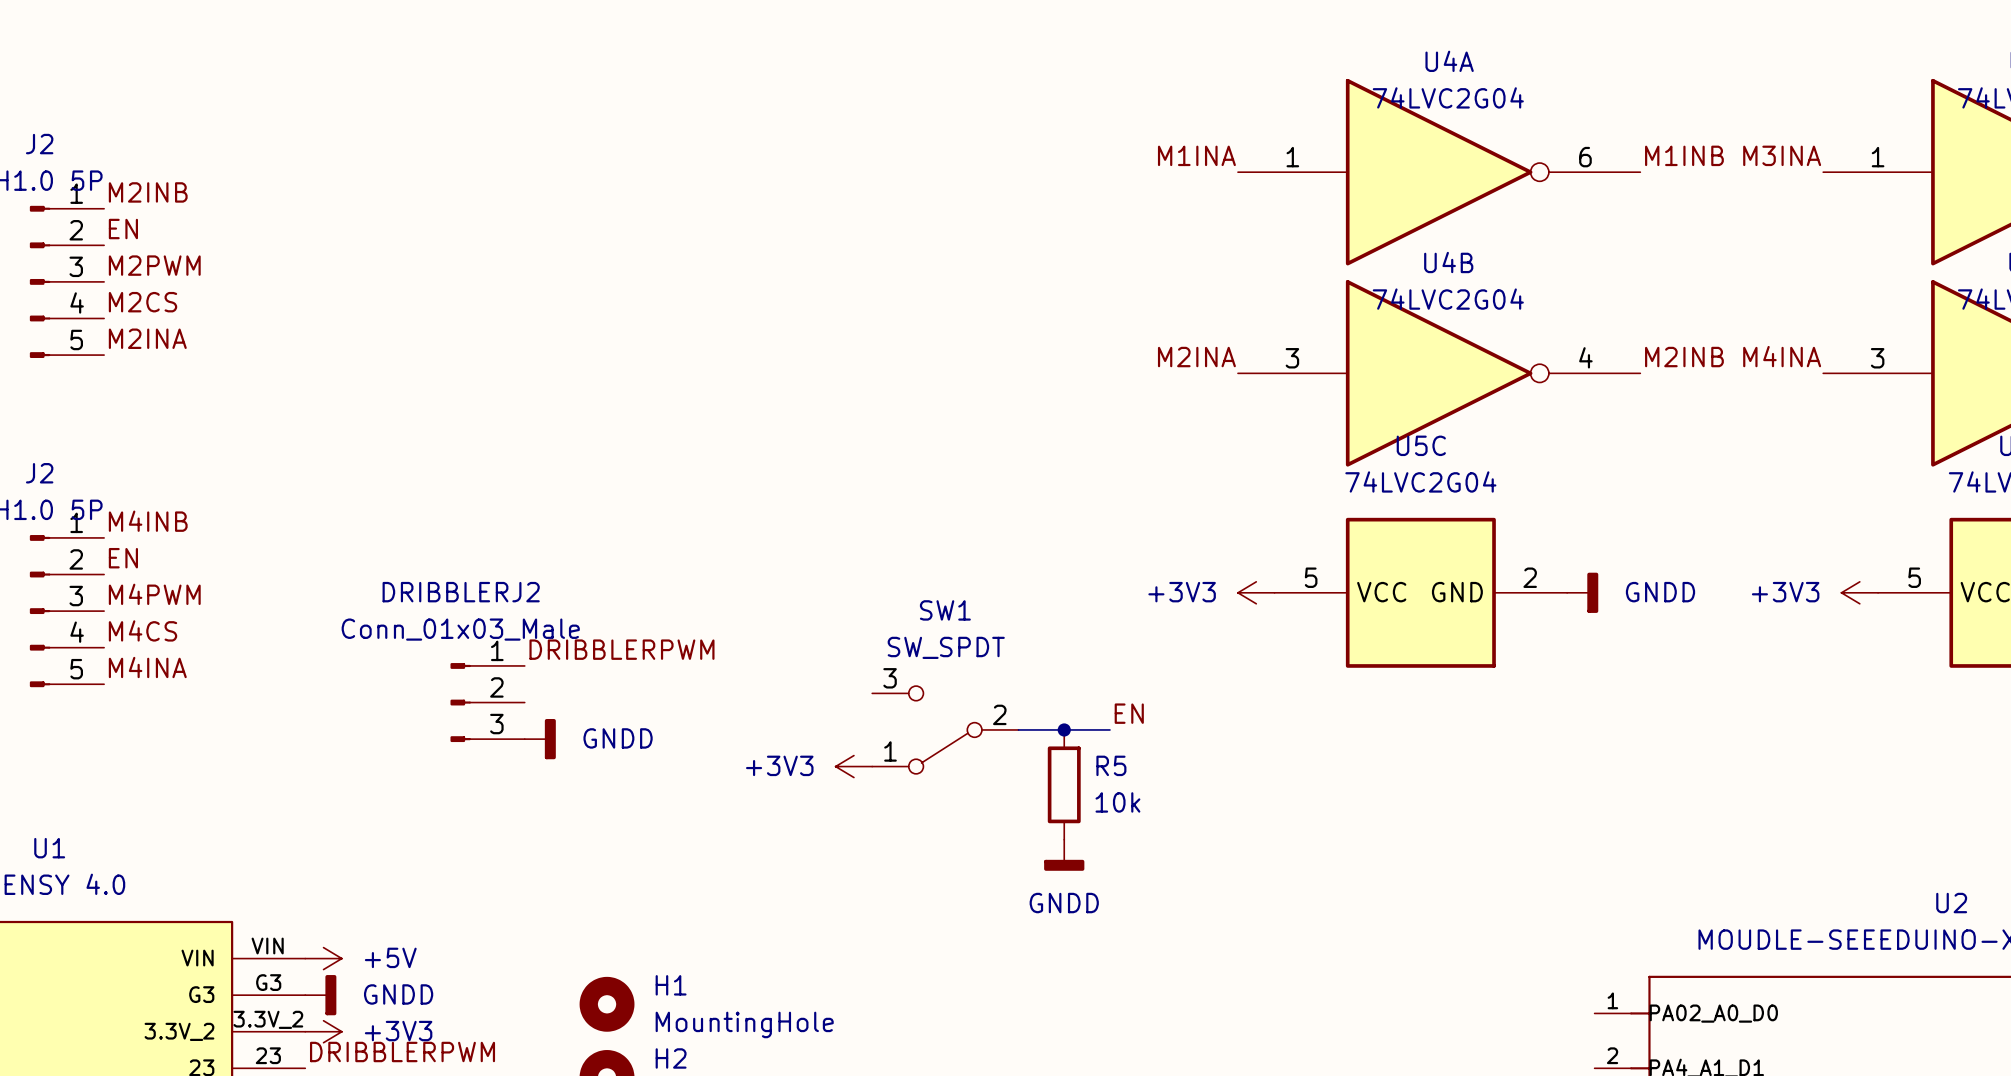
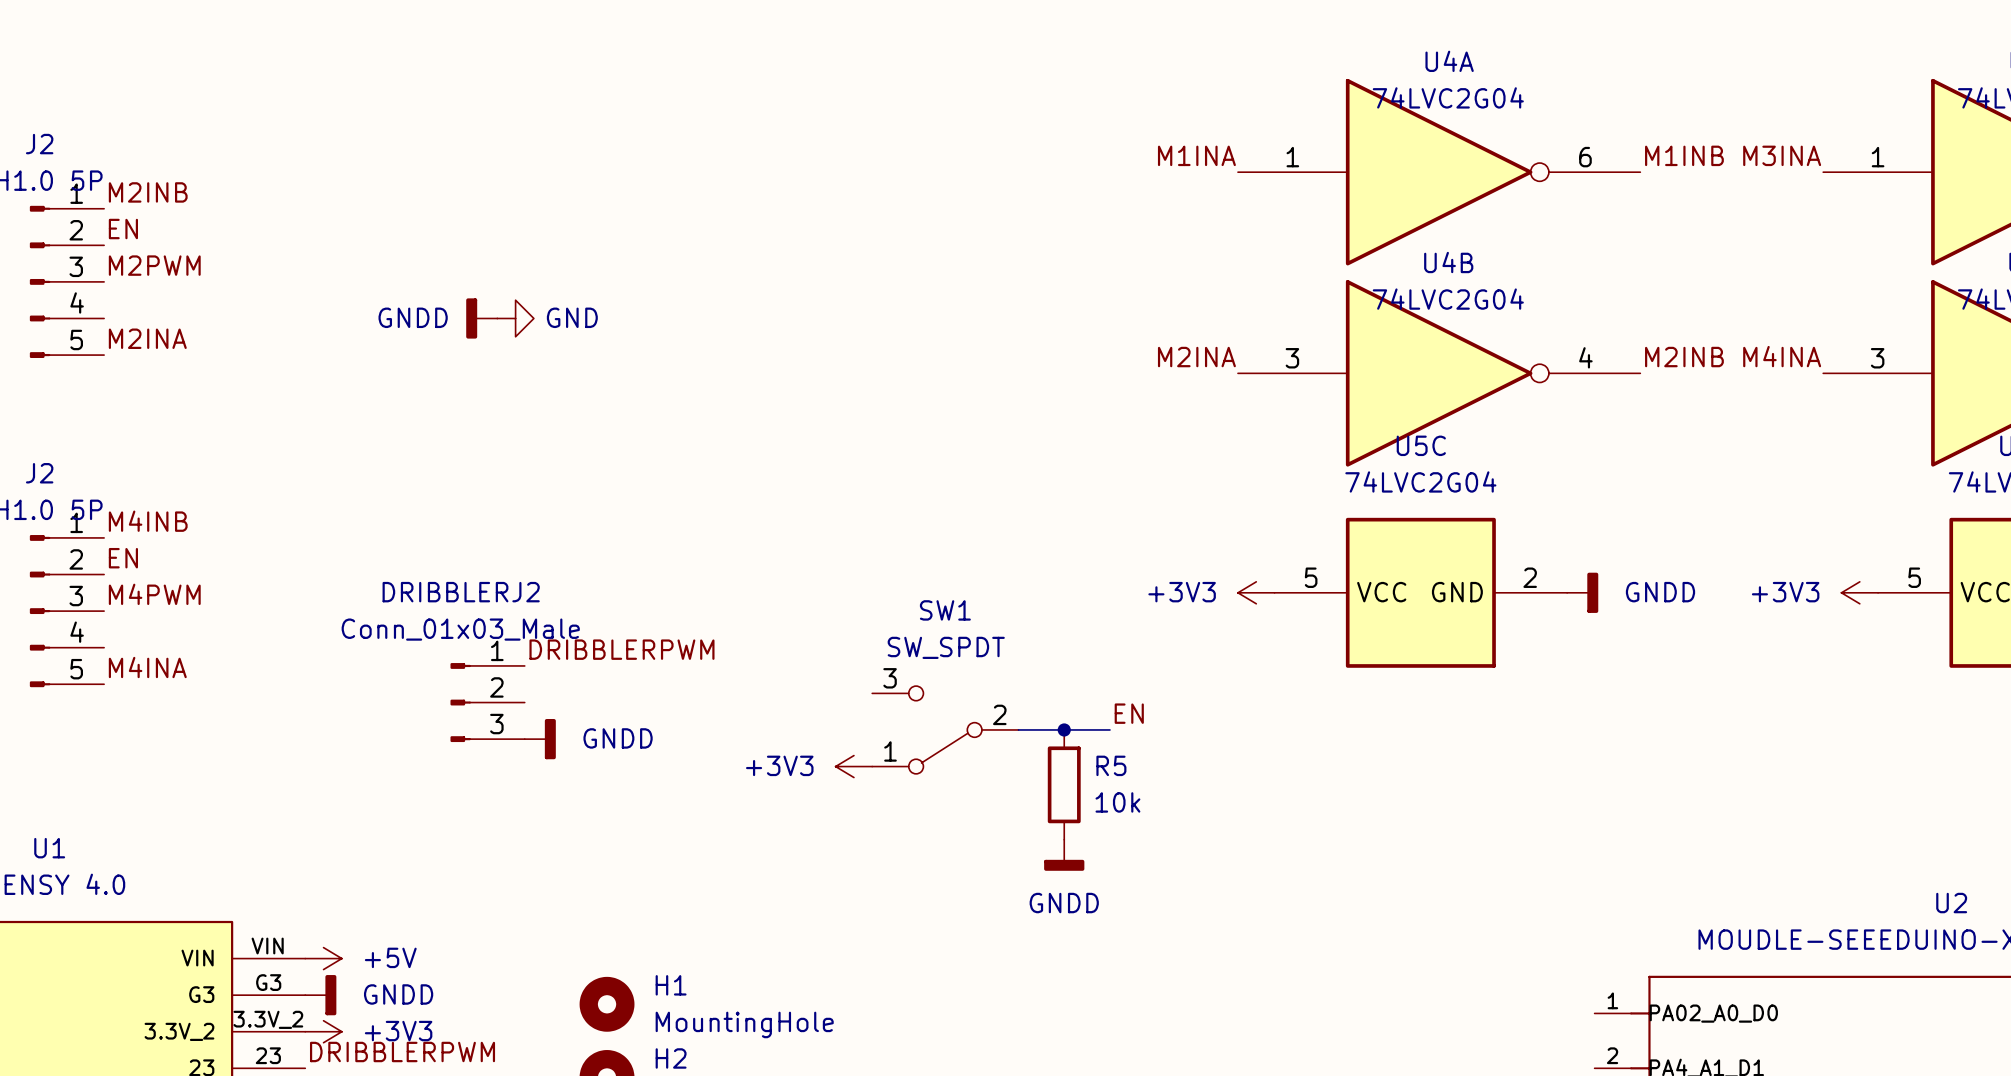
label: M2CS (142, 302) -> none
power symbol: none -> GNDD (481, 318)
power symbol: none -> GND (515, 318)
label: M4CS (142, 630) -> none

